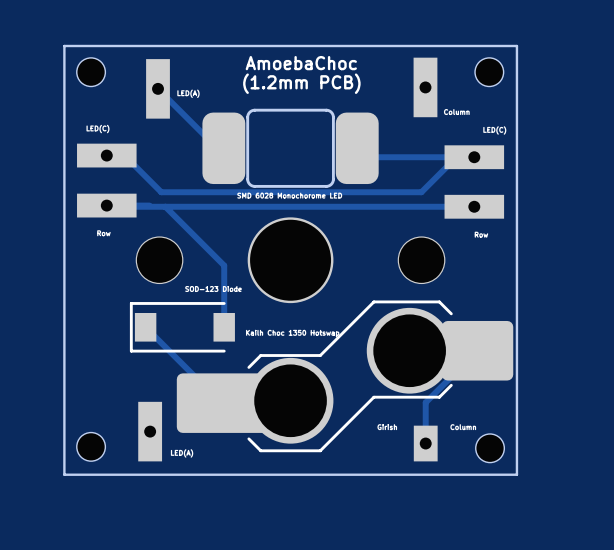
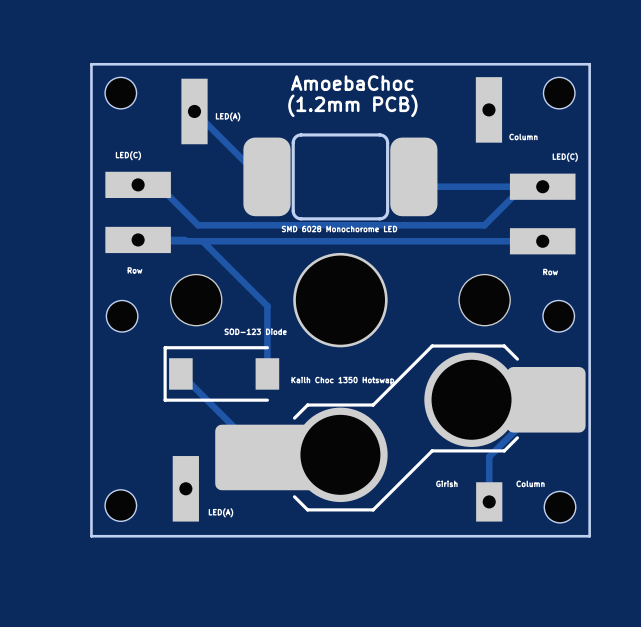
part: none -> (122, 316)
part: none -> (558, 316)

